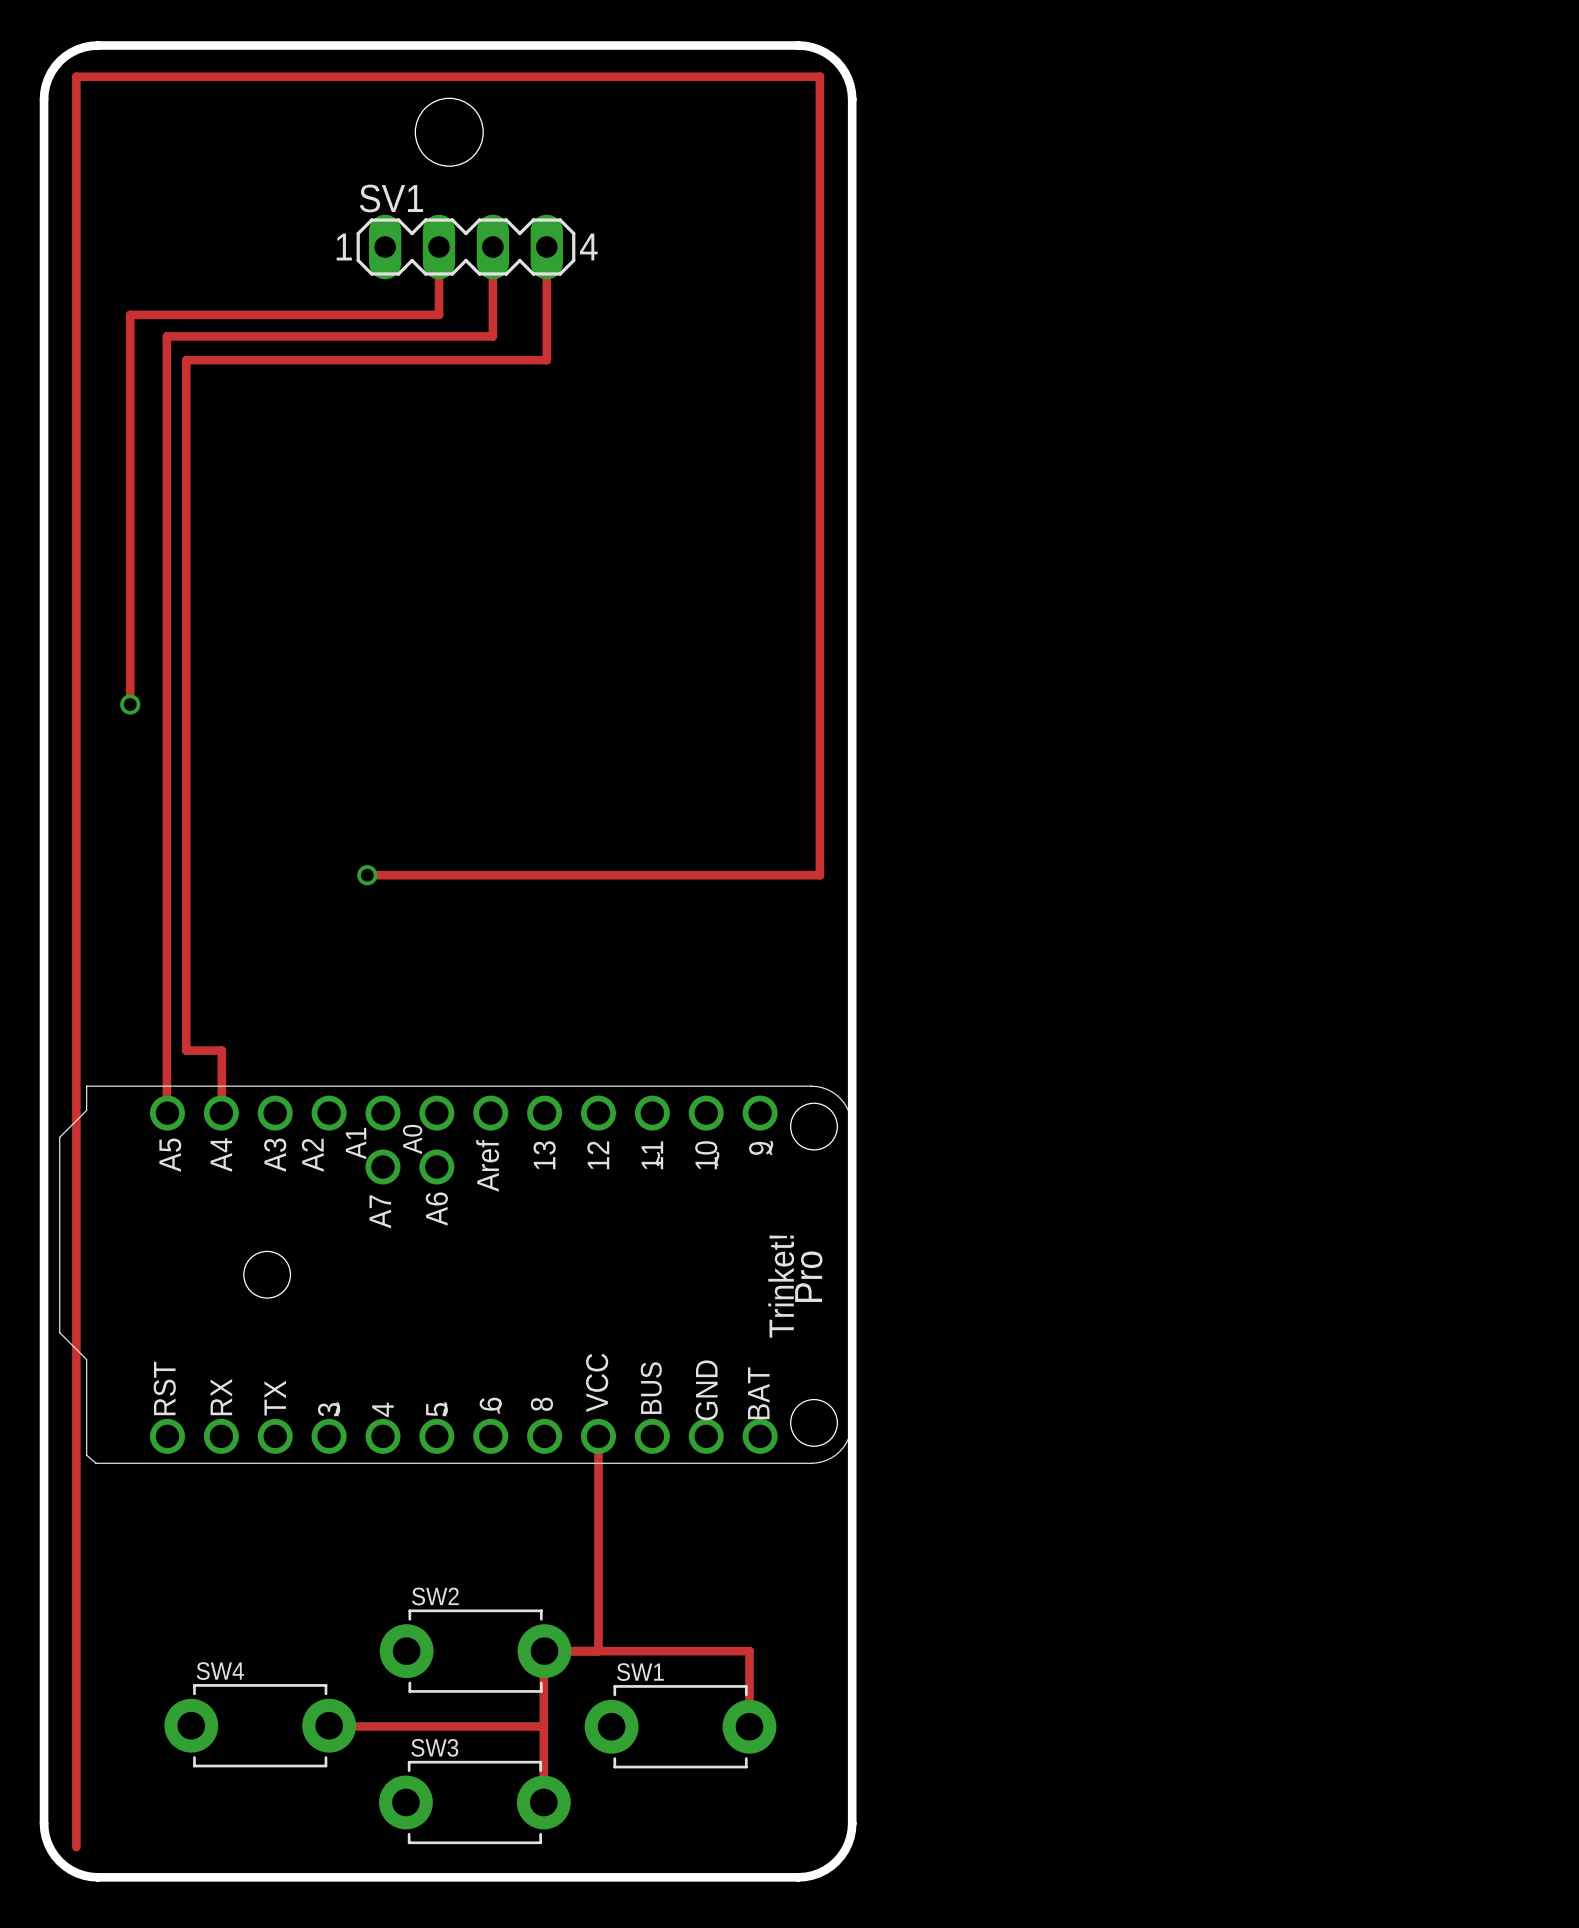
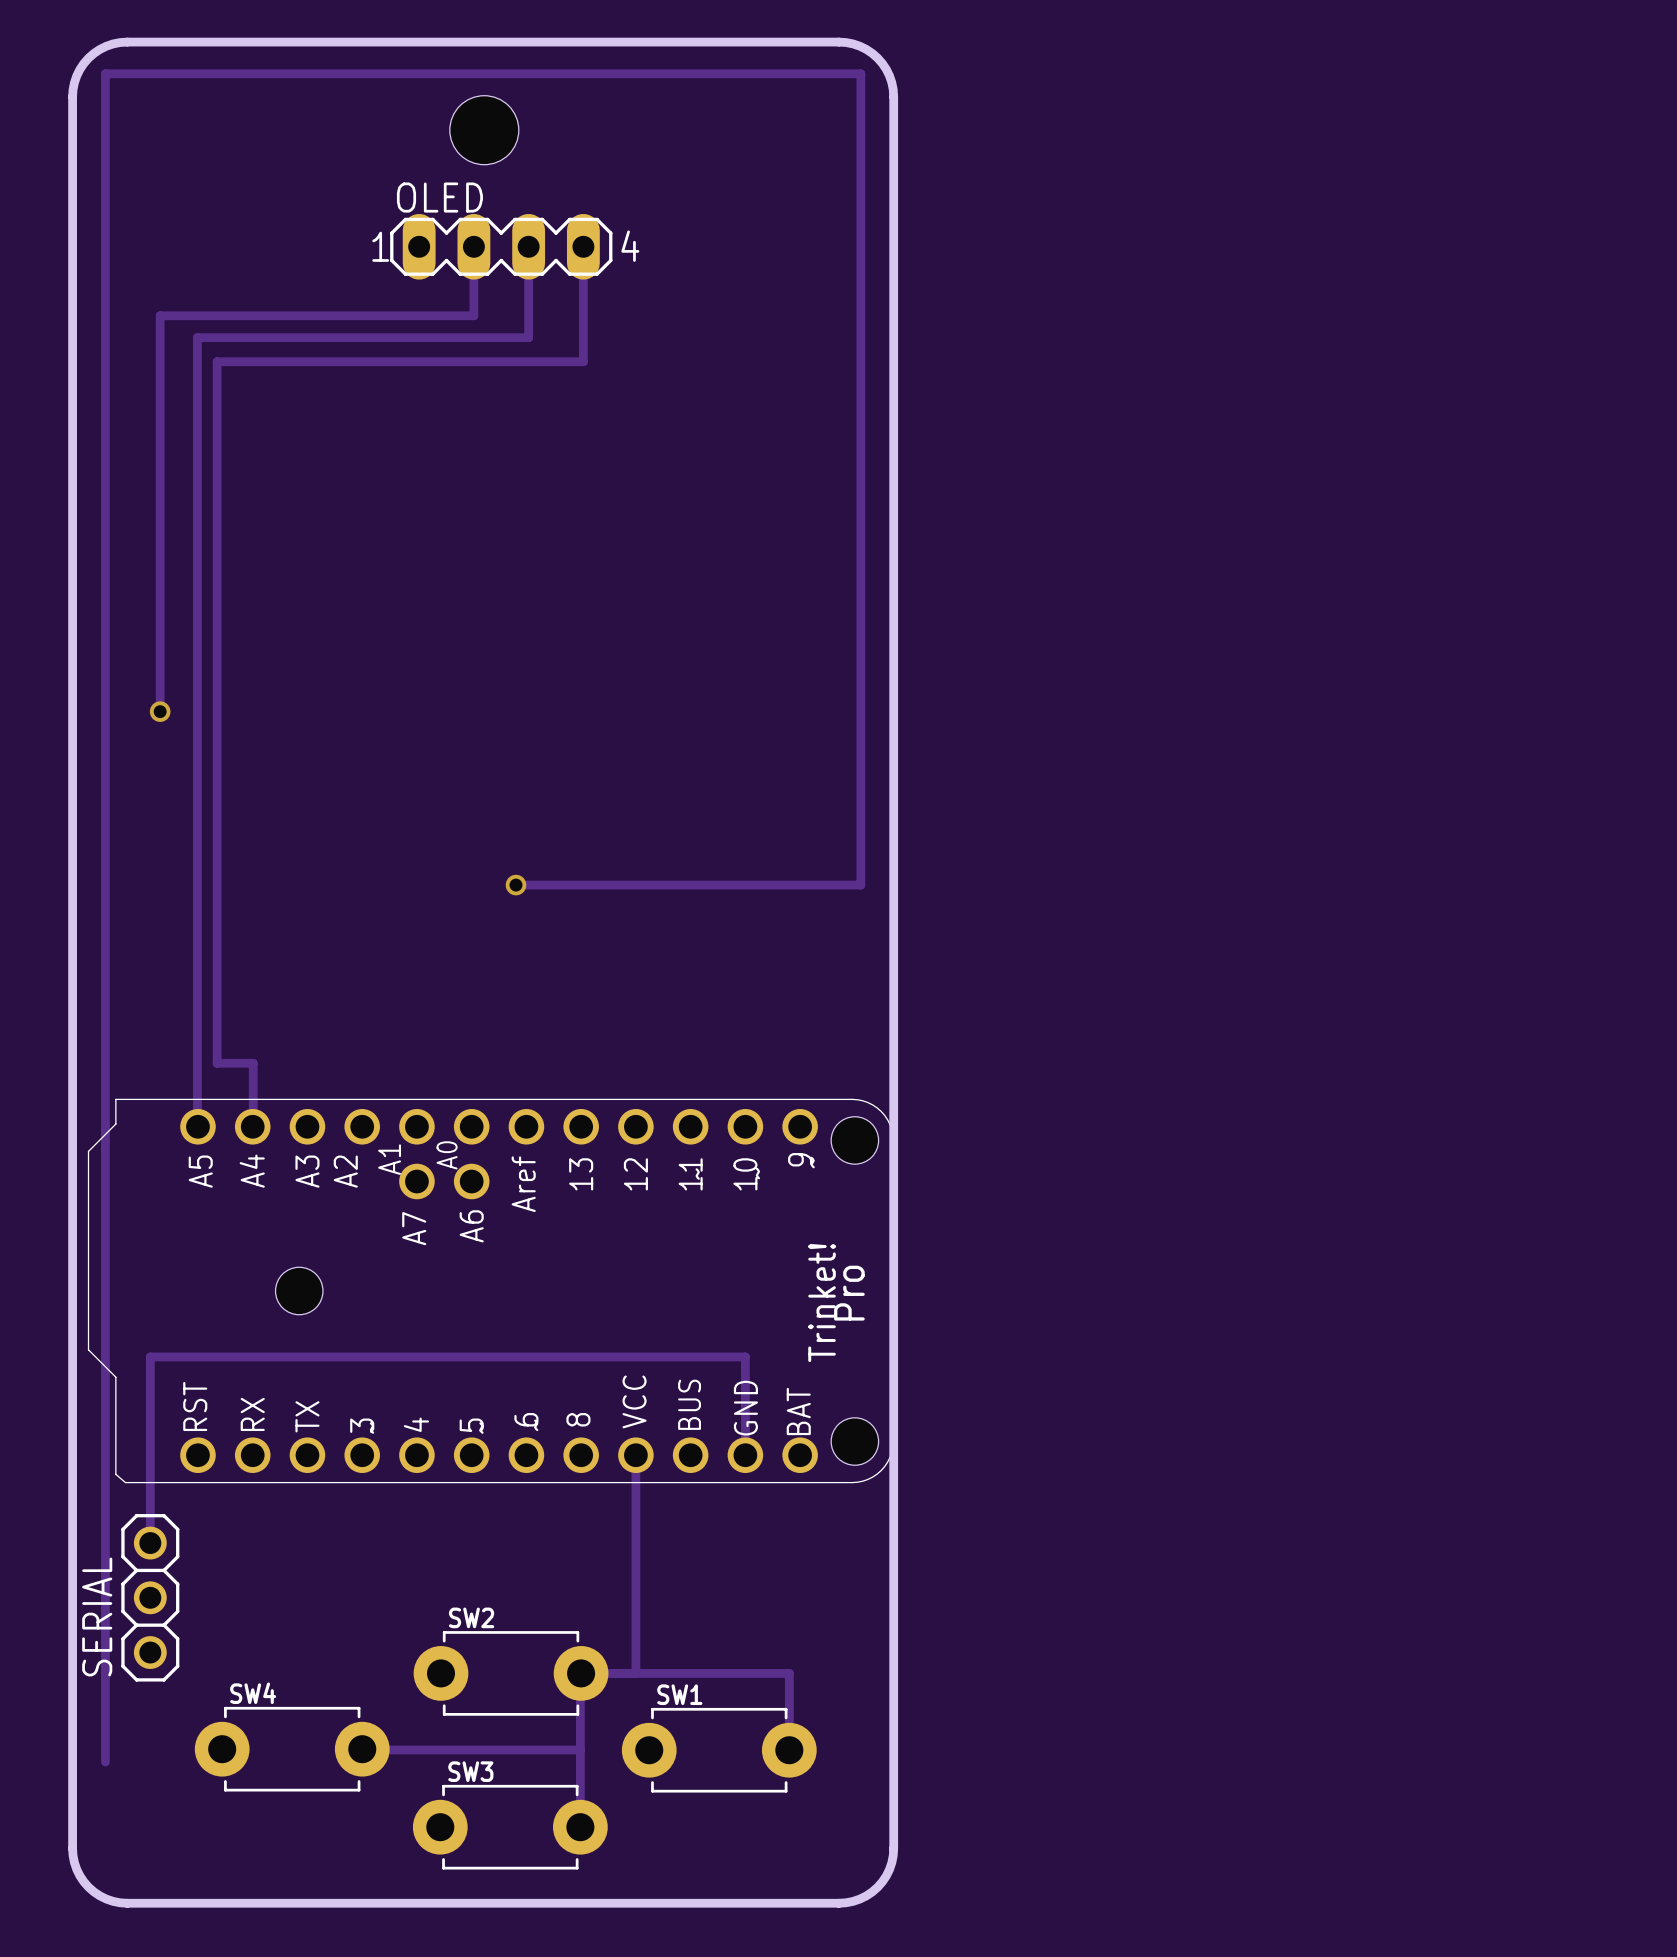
SV1 name: SV1 (391, 198) -> OLED (439, 197)
track: (367, 875) (480, 875) -> none
via position: (367, 875) -> (515, 885)
track: none -> (745, 1455) (745, 1356) (150, 1356) (150, 1543)
SERIAL: none -> (150, 1597)
track: (76, 1738) (76, 1847) -> none

